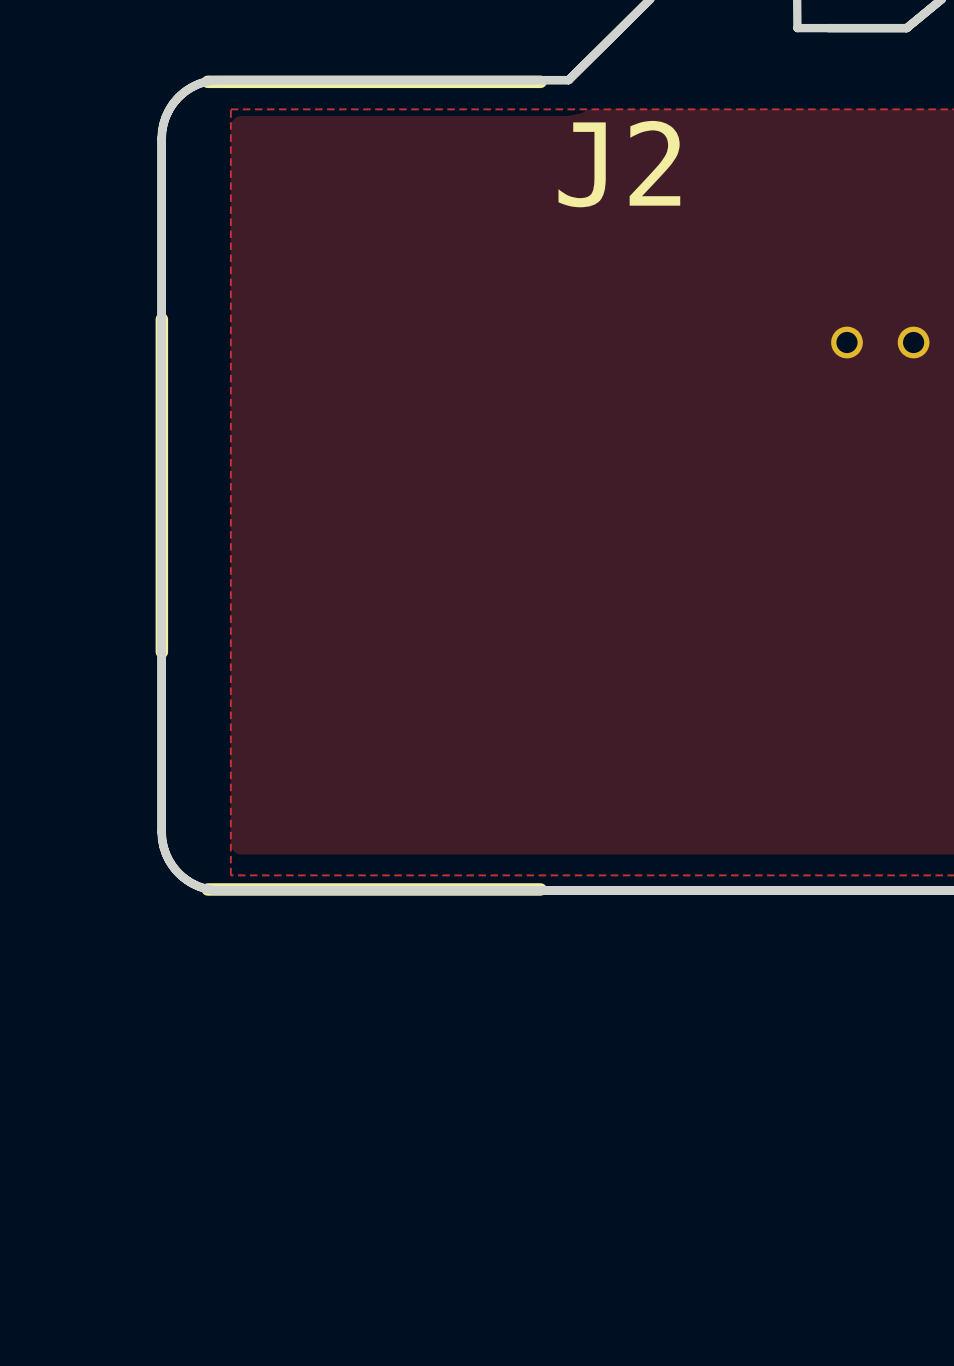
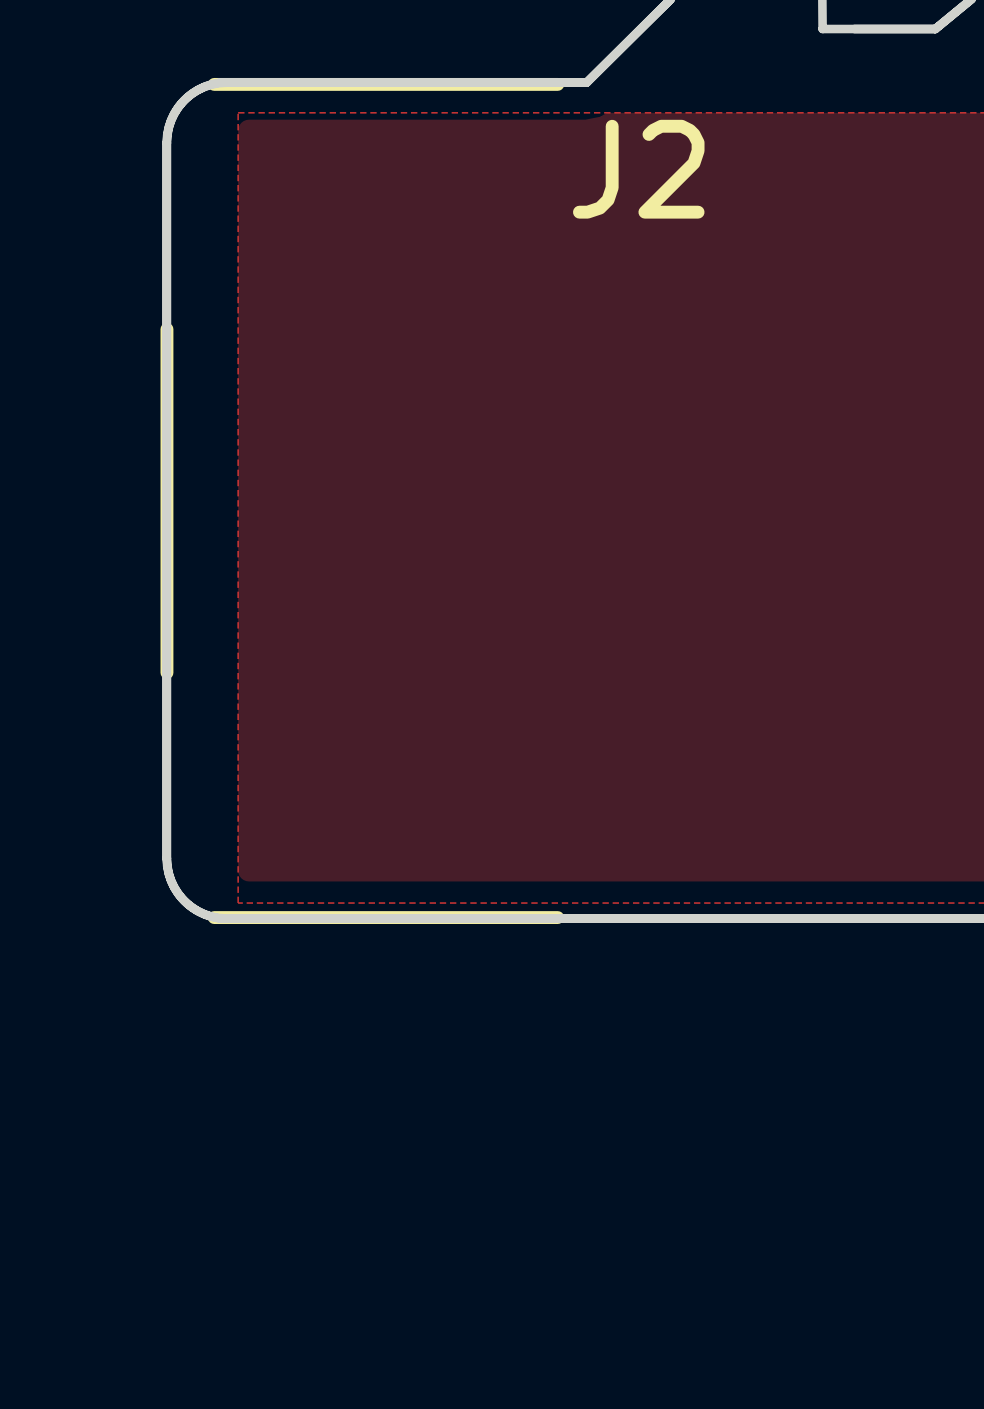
part: (846, 342) -> none
part: (913, 342) -> none

